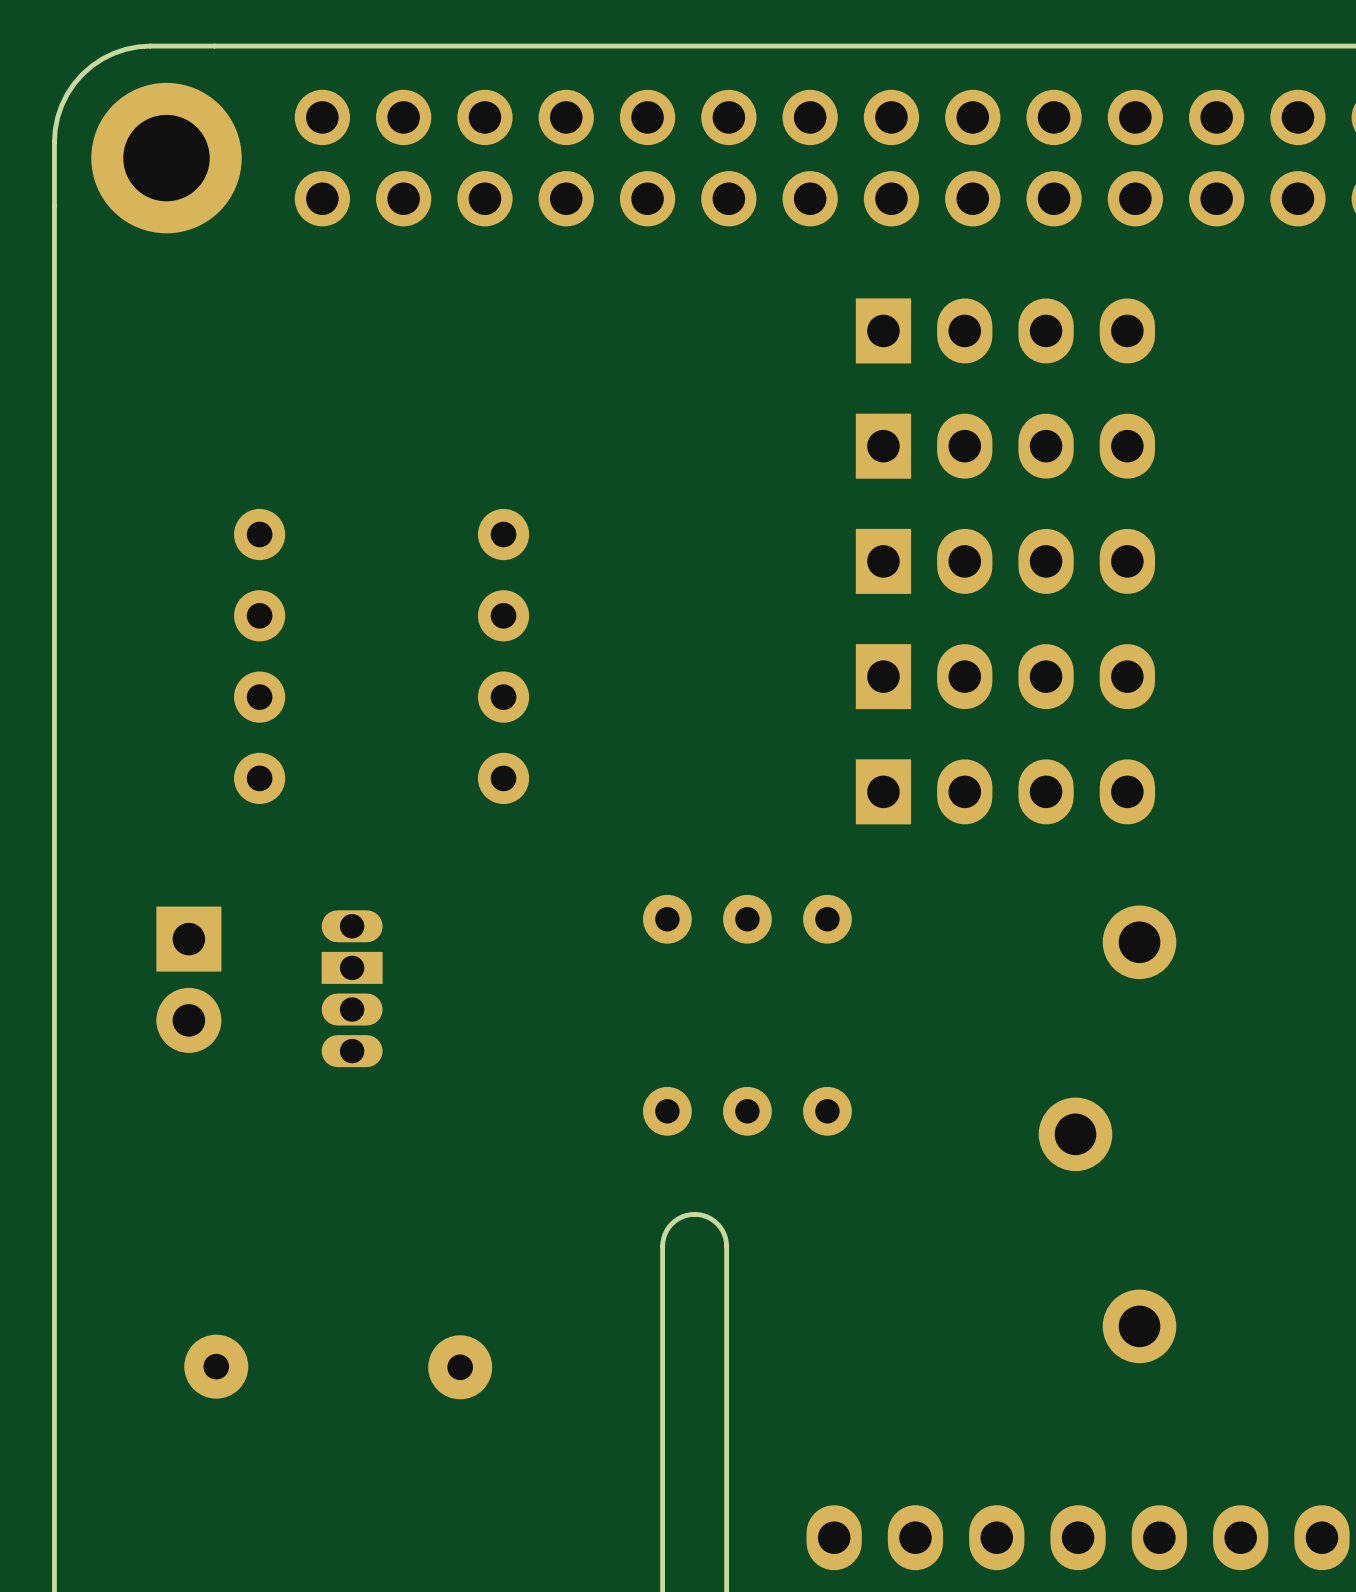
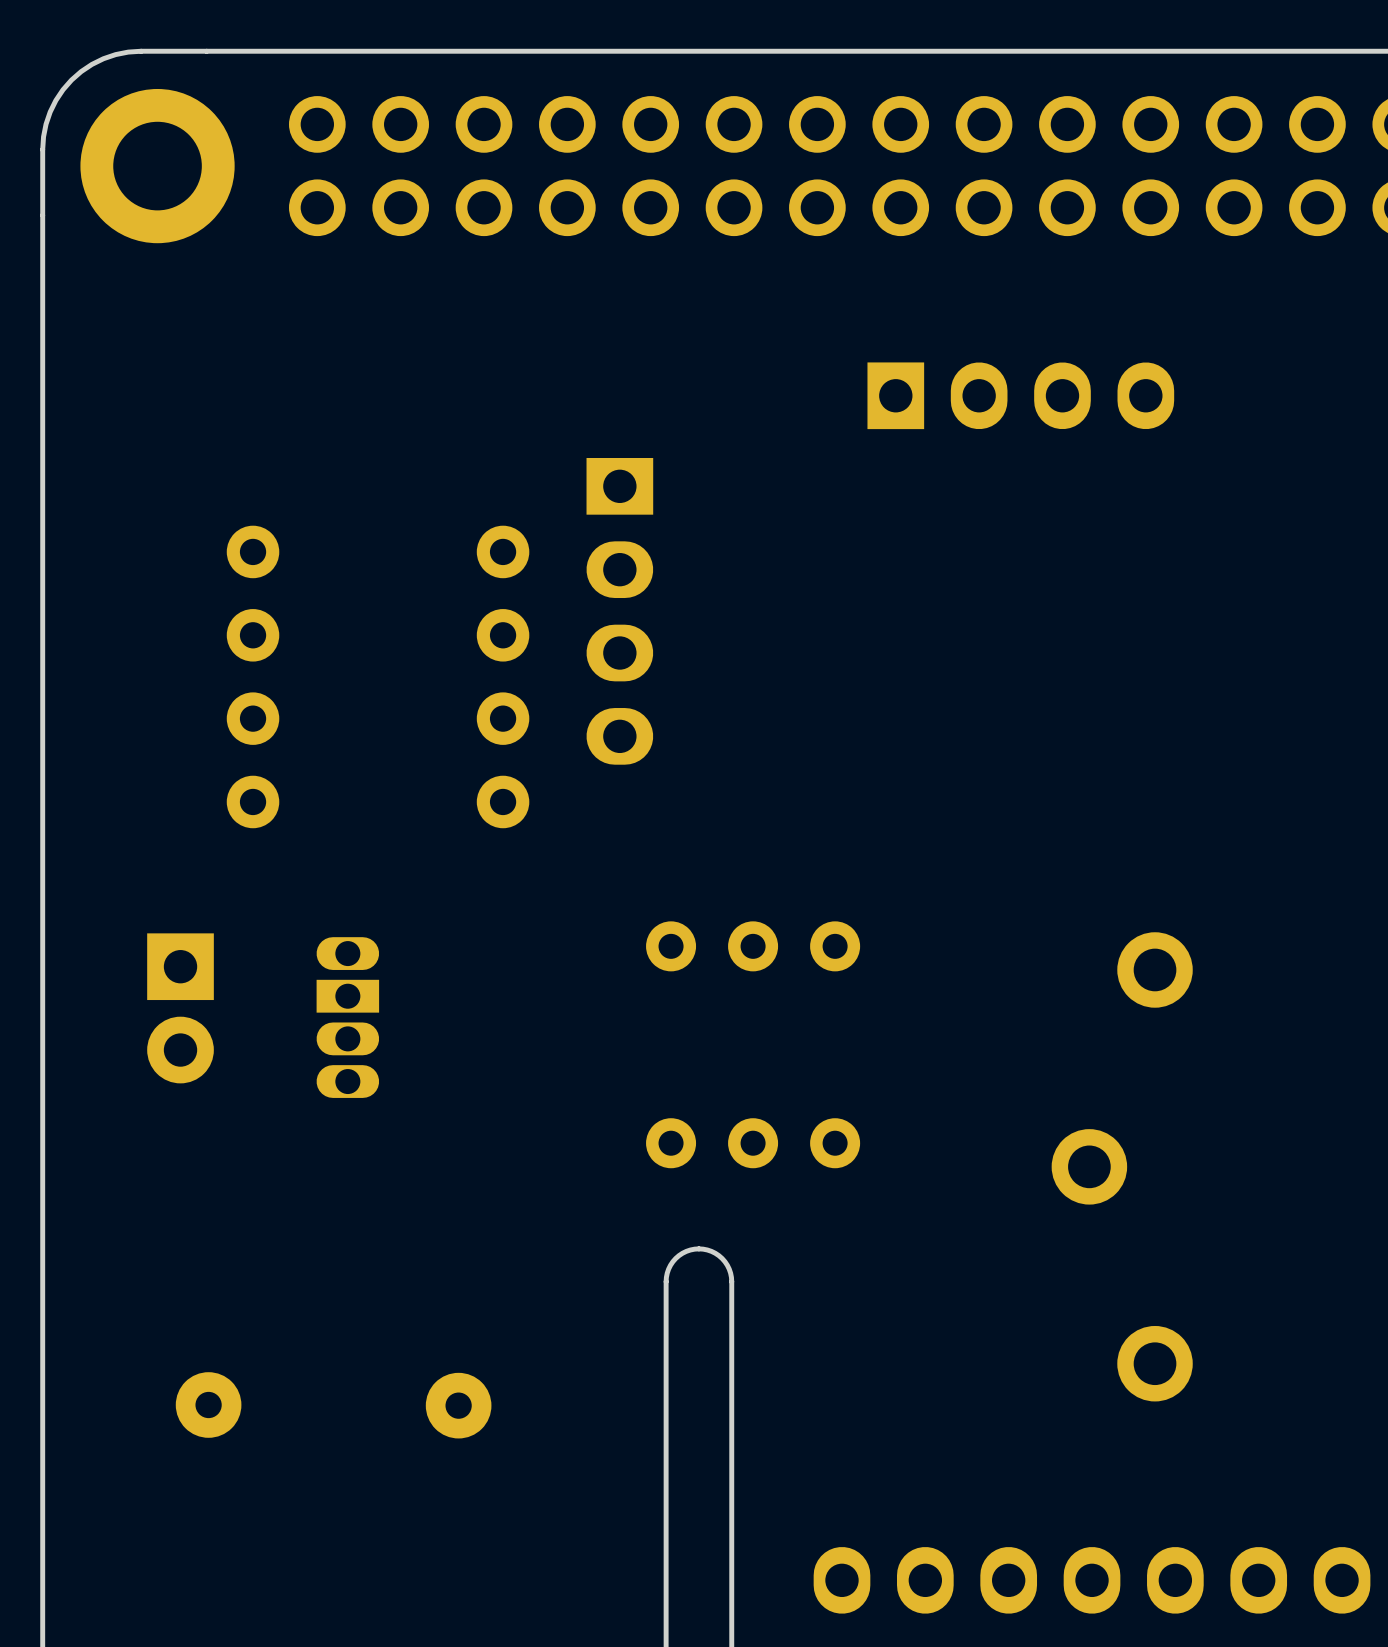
part: (1005, 330) -> none
part: none -> (1020, 395)
part: (1005, 446) -> none
part: (1005, 561) -> none
part: none -> (619, 611)
part: (1005, 676) -> none
part: (1005, 791) -> none

